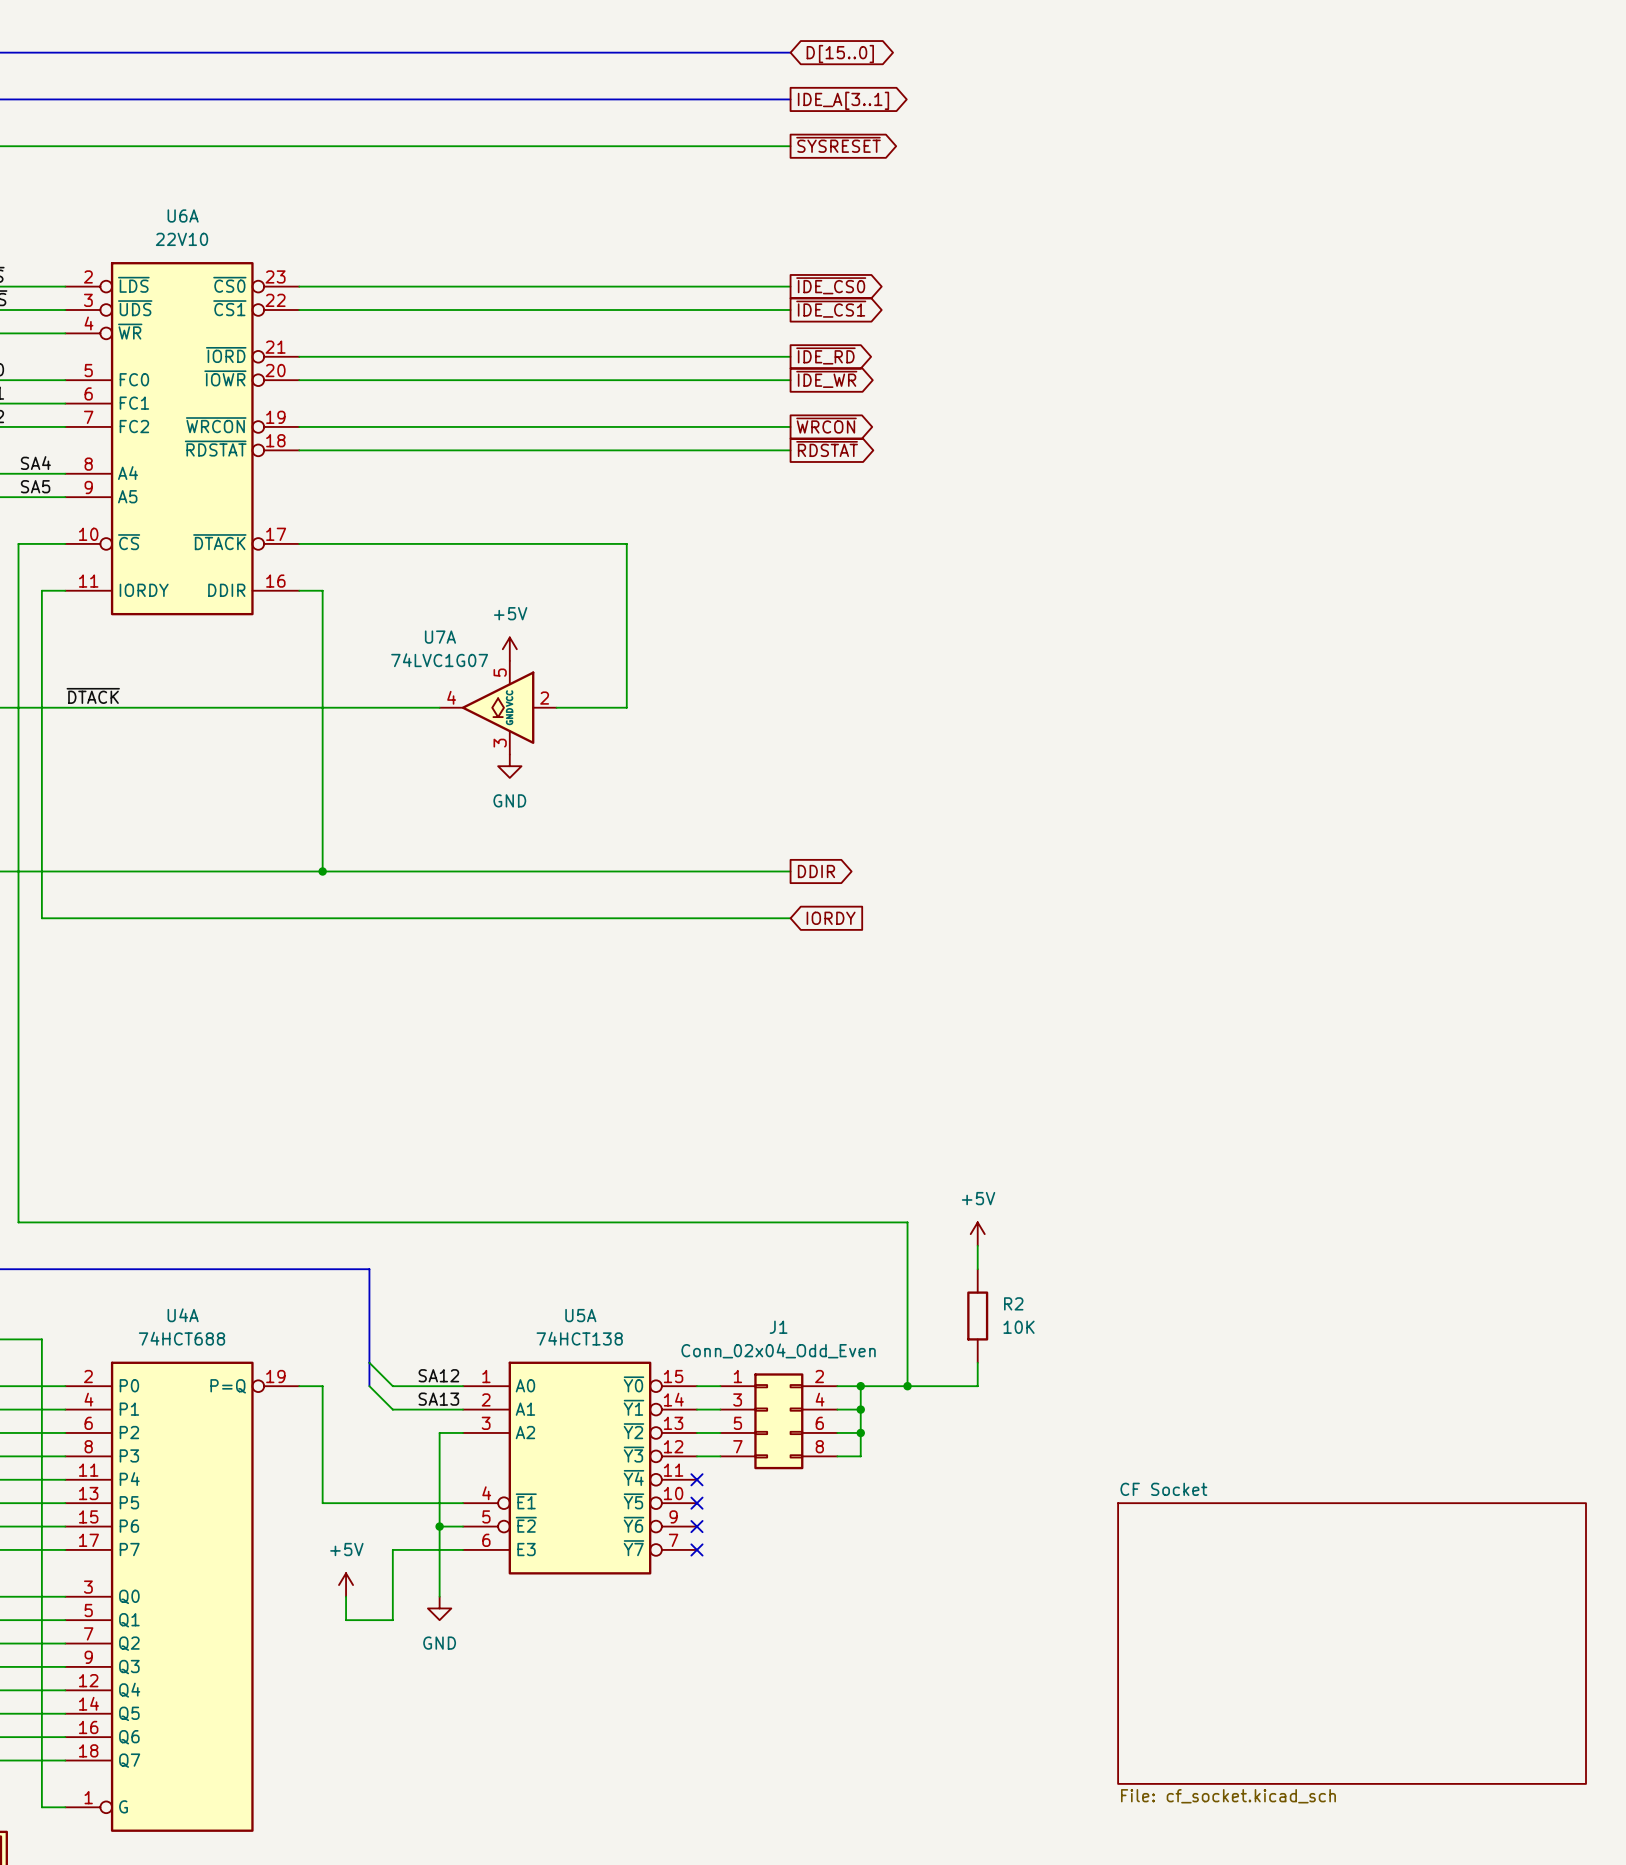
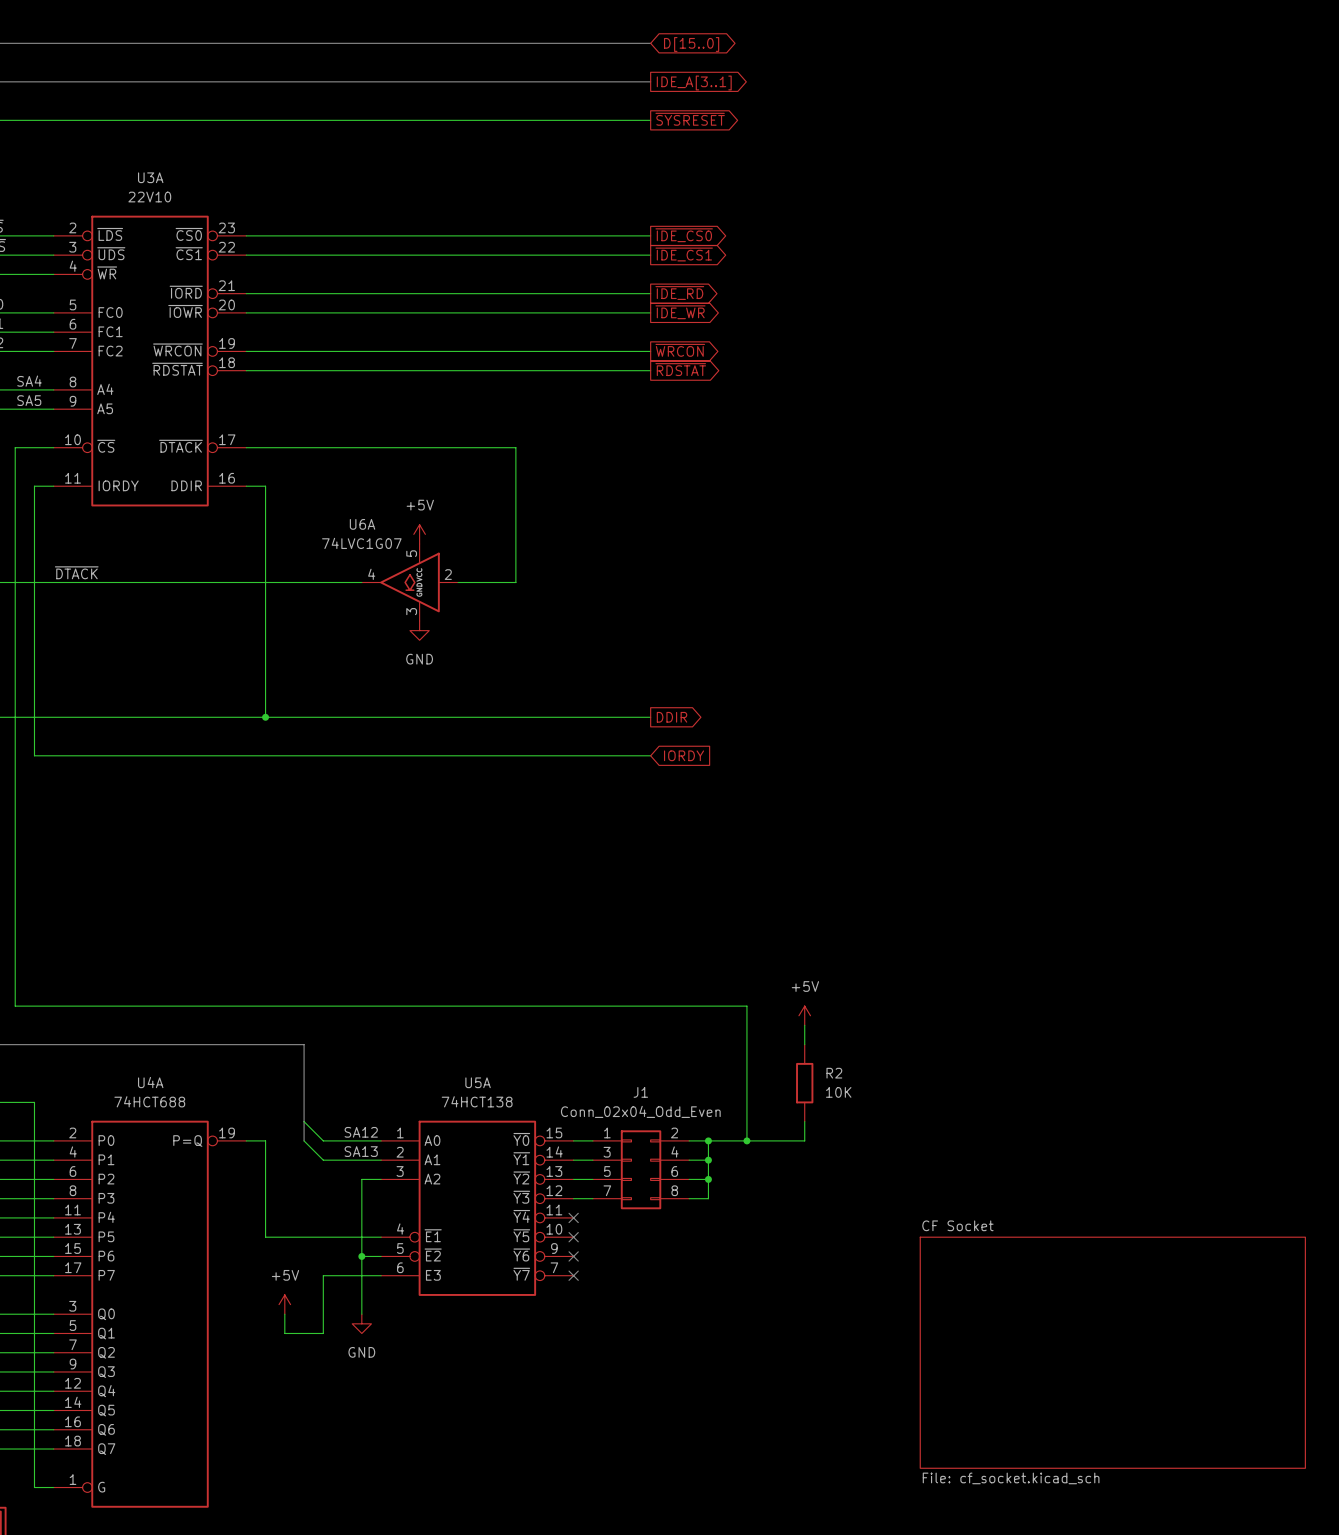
U6A name: U6A (183, 215) -> U3A (150, 177)
U7A name: U7A (440, 637) -> U6A (362, 524)

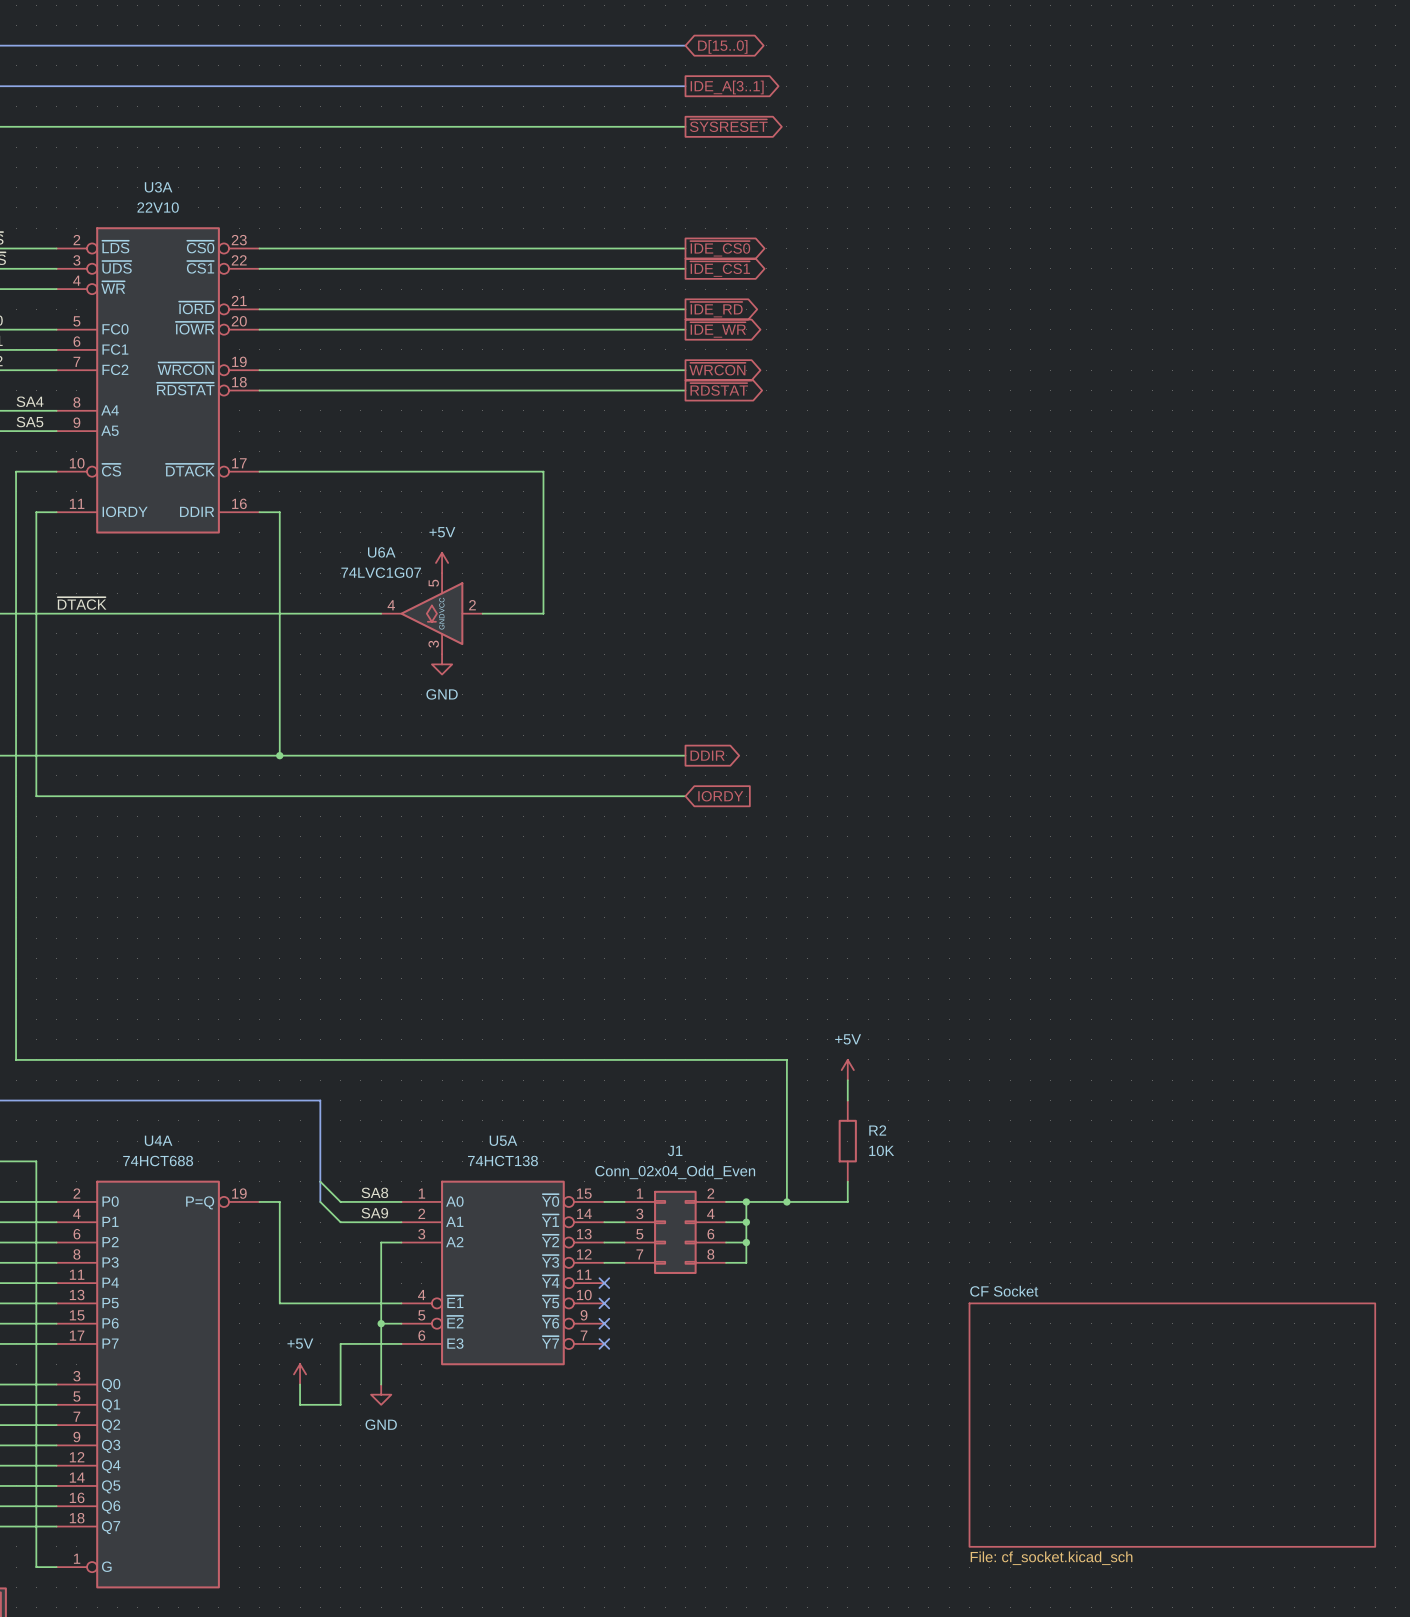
label: SA12 (361, 1132) -> SA8 (374, 1192)
label: SA13 (361, 1151) -> SA9 (374, 1213)

